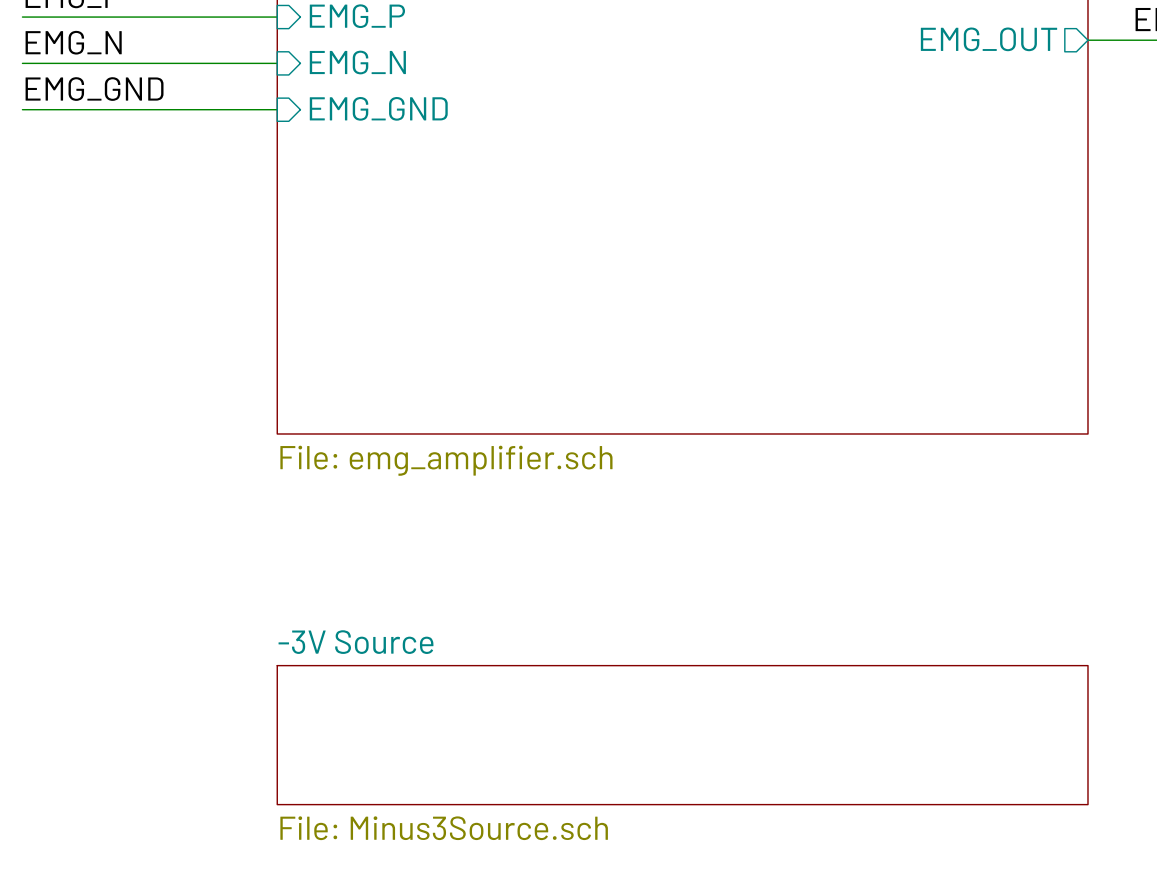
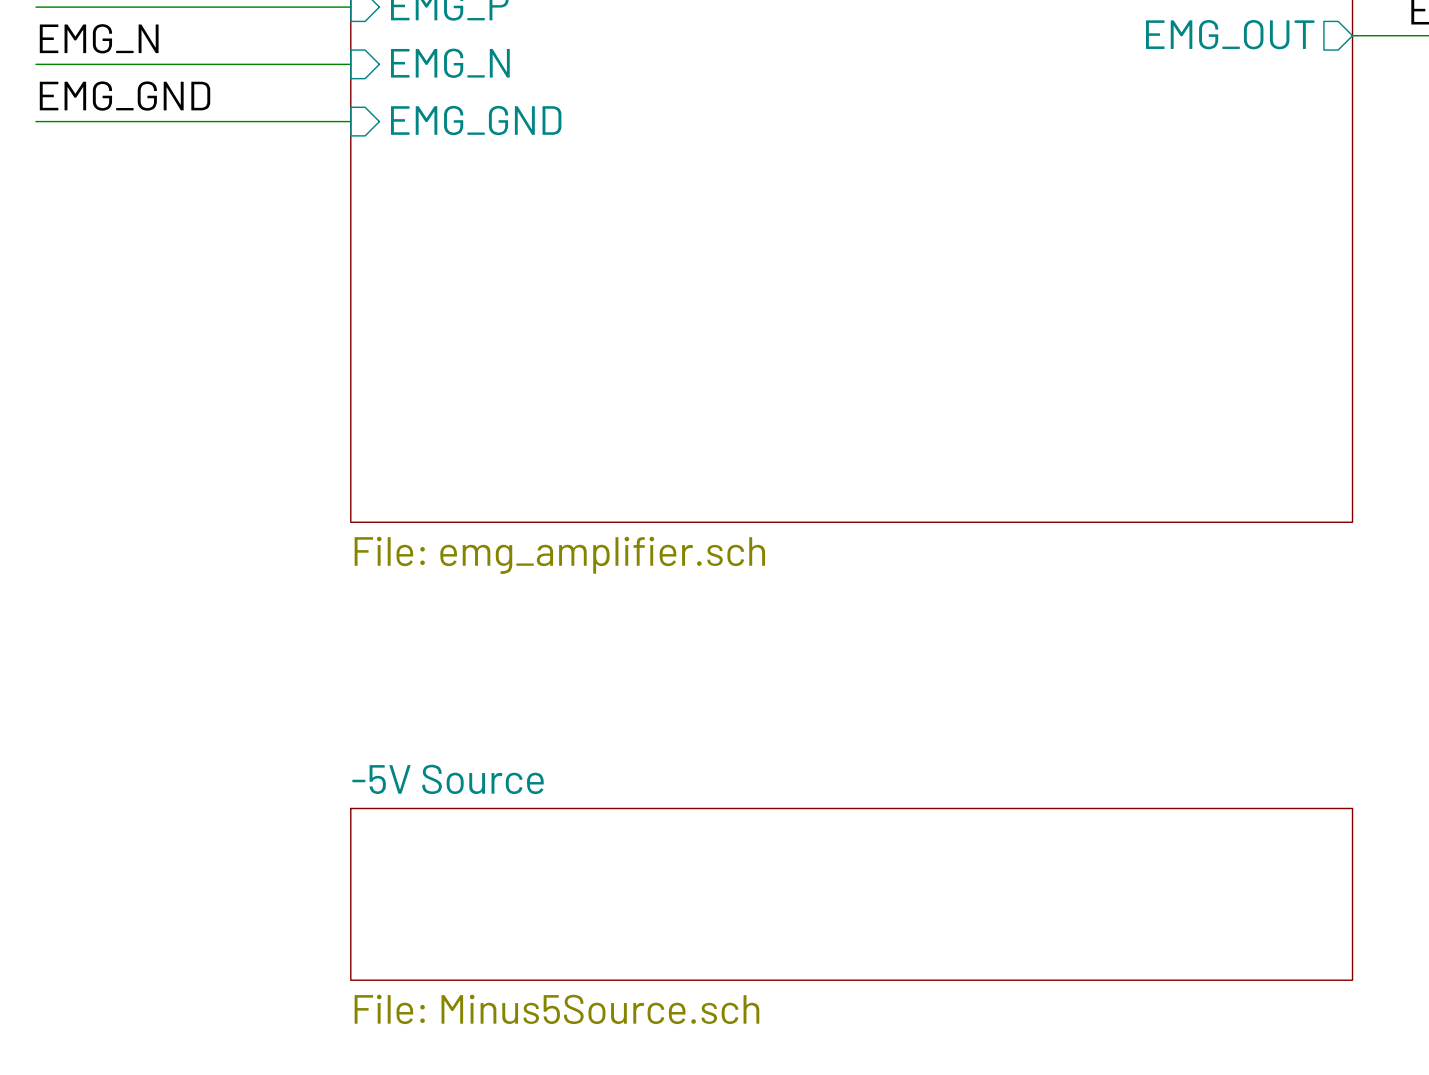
sheet -3V Source name: -3V Source (355, 642) -> -5V Source (448, 779)
sheet -3V Source value: File: Minus3Source.sch (444, 828) -> File: Minus5Source.sch (556, 1009)

